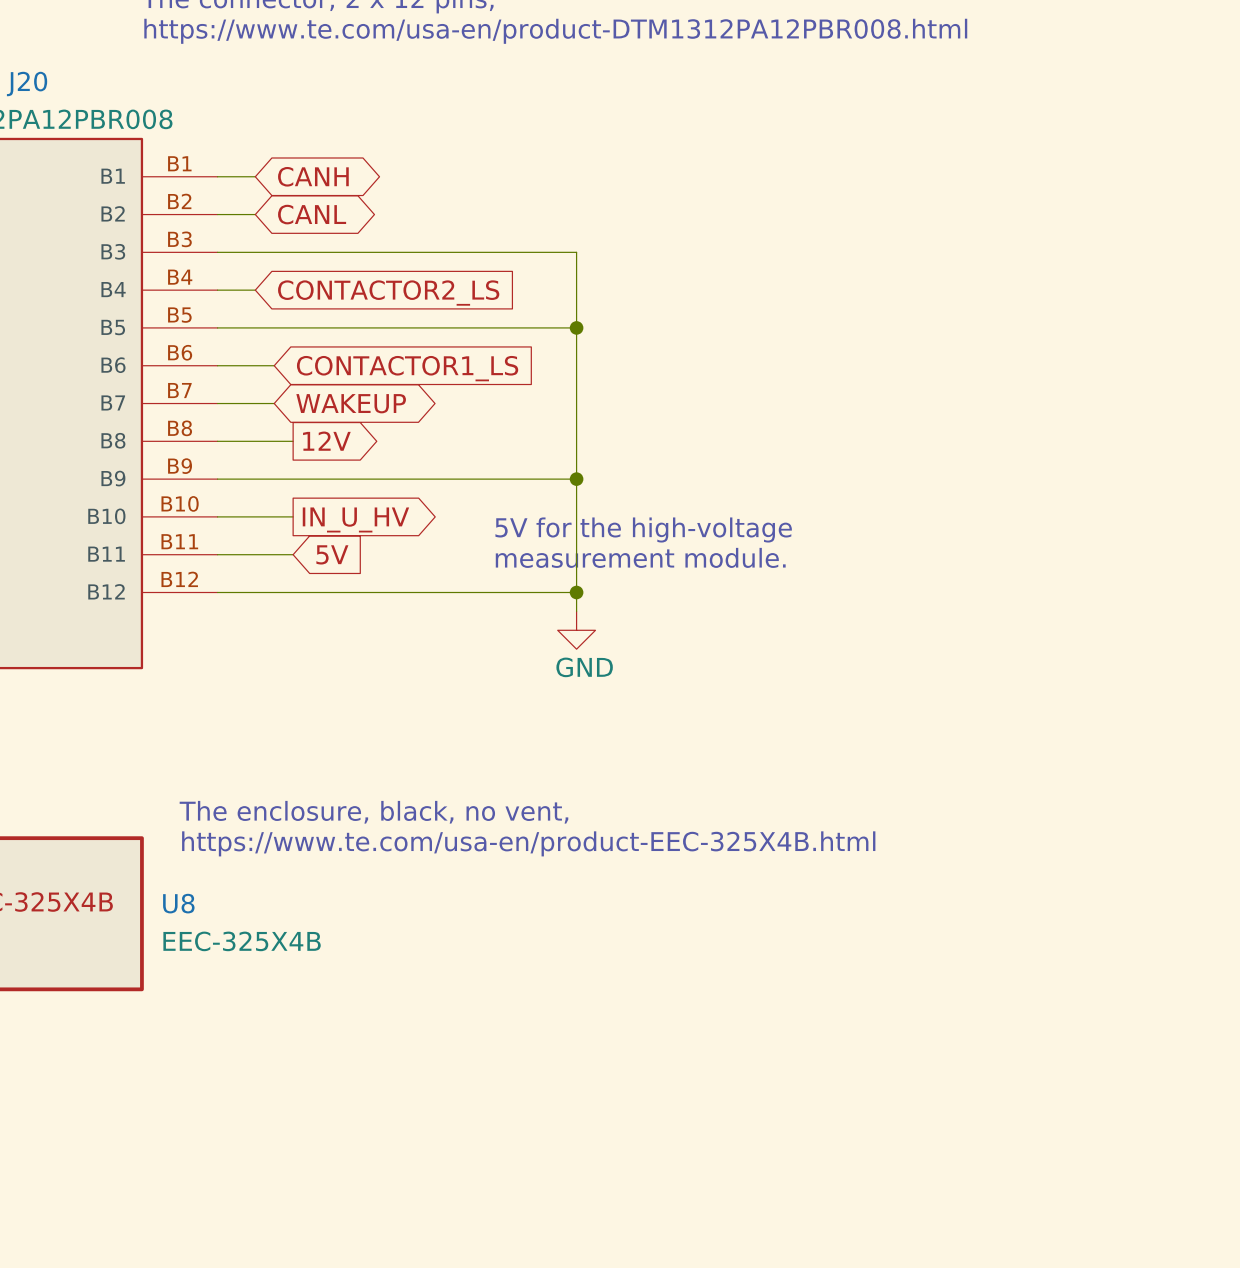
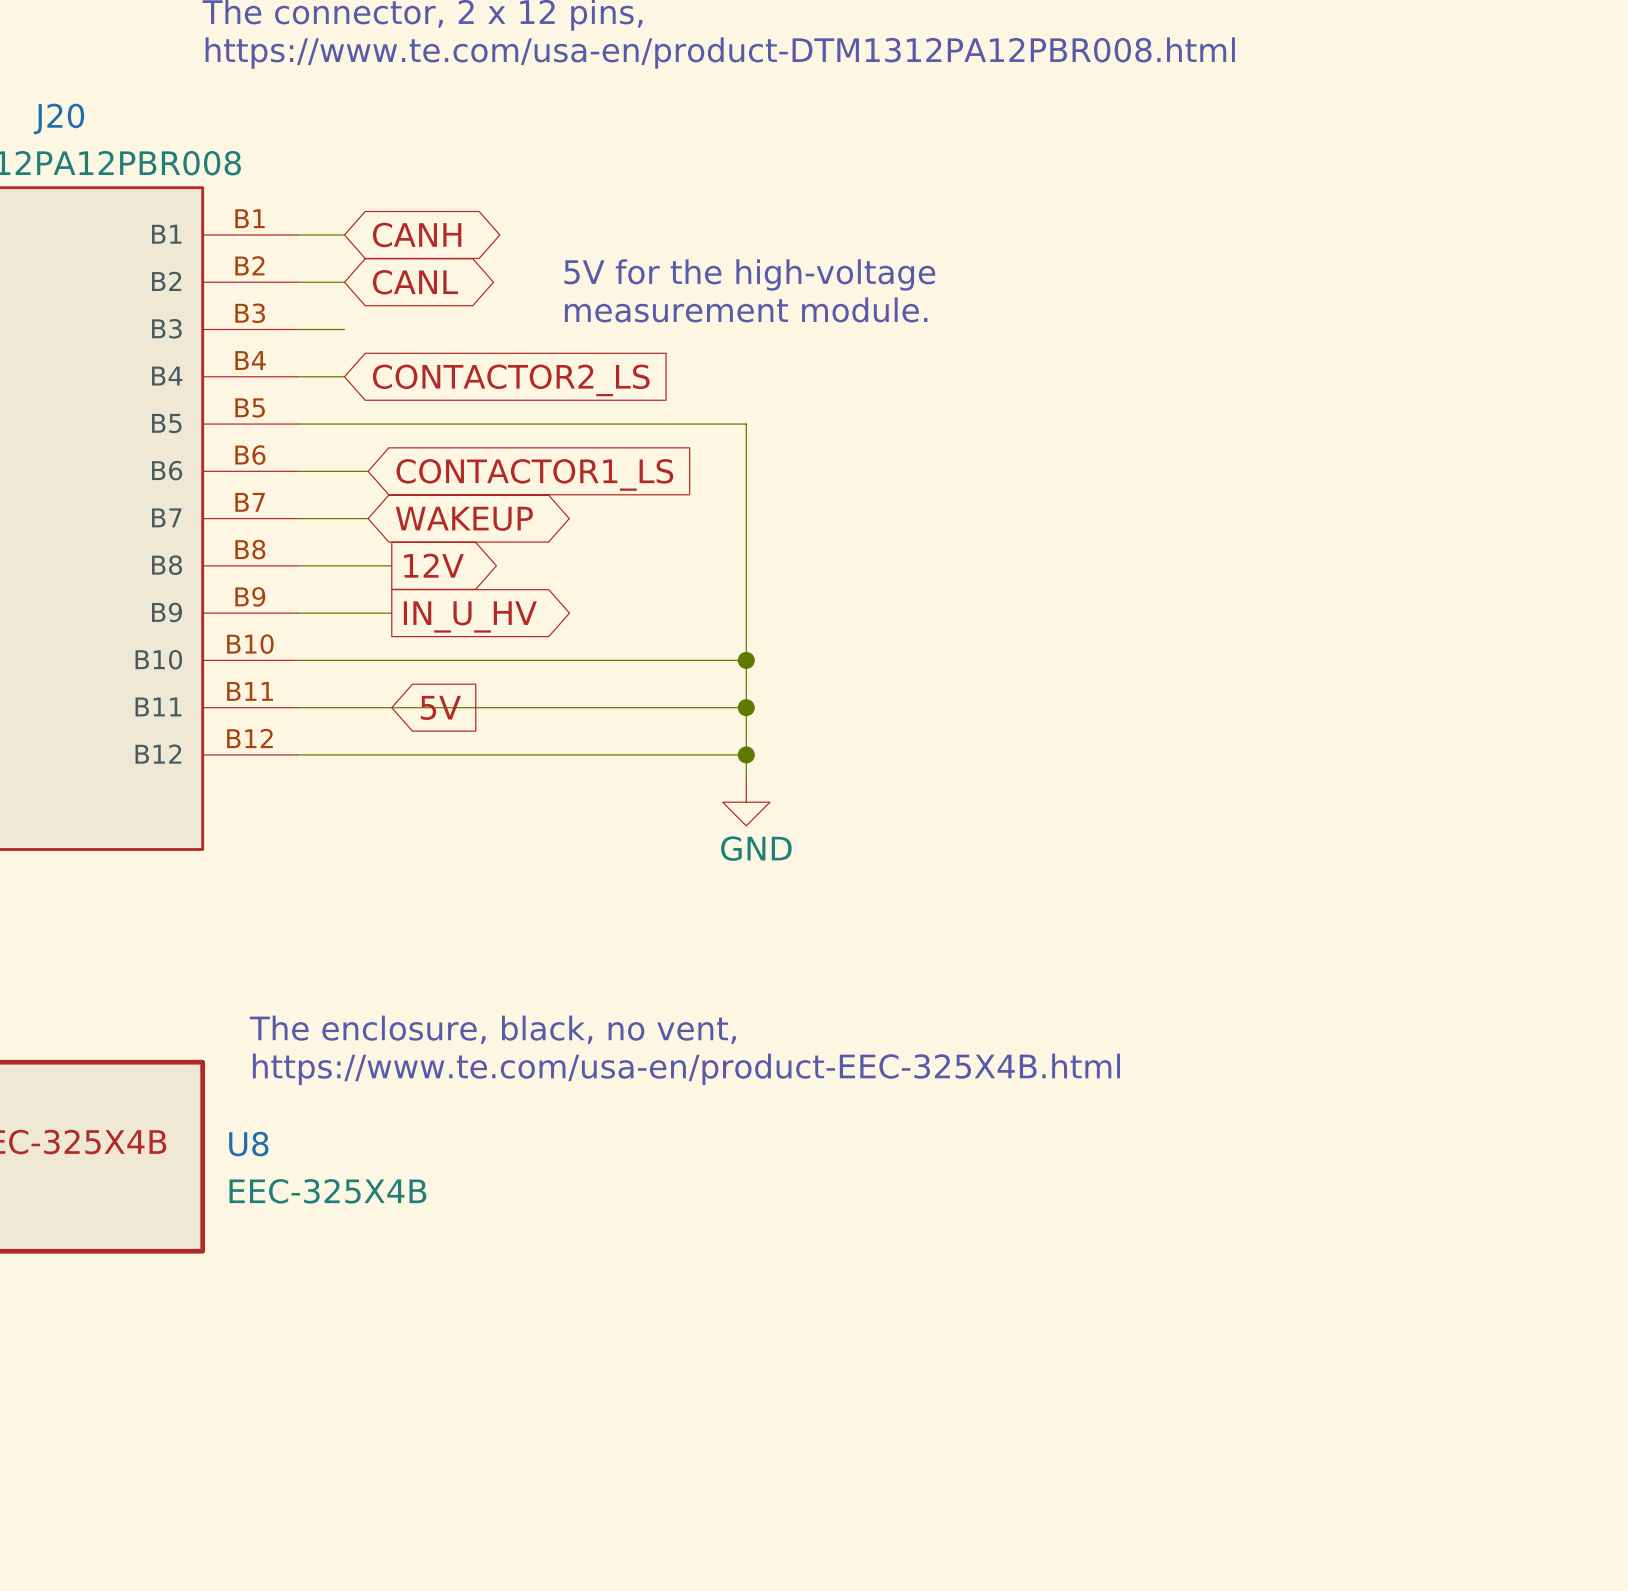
wire: (255, 252) (576, 252) (576, 327) -> none
junction: (576, 327) -> none
wire: (293, 479) (576, 479) -> (391, 660) (746, 660)
junction: (576, 479) -> none
junction: none -> (746, 660)
global label position: IN_U_HV (355, 519) -> IN_U_HV (470, 616)
text position: 5V for the high-voltage (643, 529) -> 5V for the high-voltage (749, 274)
wire: none -> (391, 707) (746, 707)
junction: none -> (746, 707)
text position: measurement module. (640, 557) -> measurement module. (746, 309)

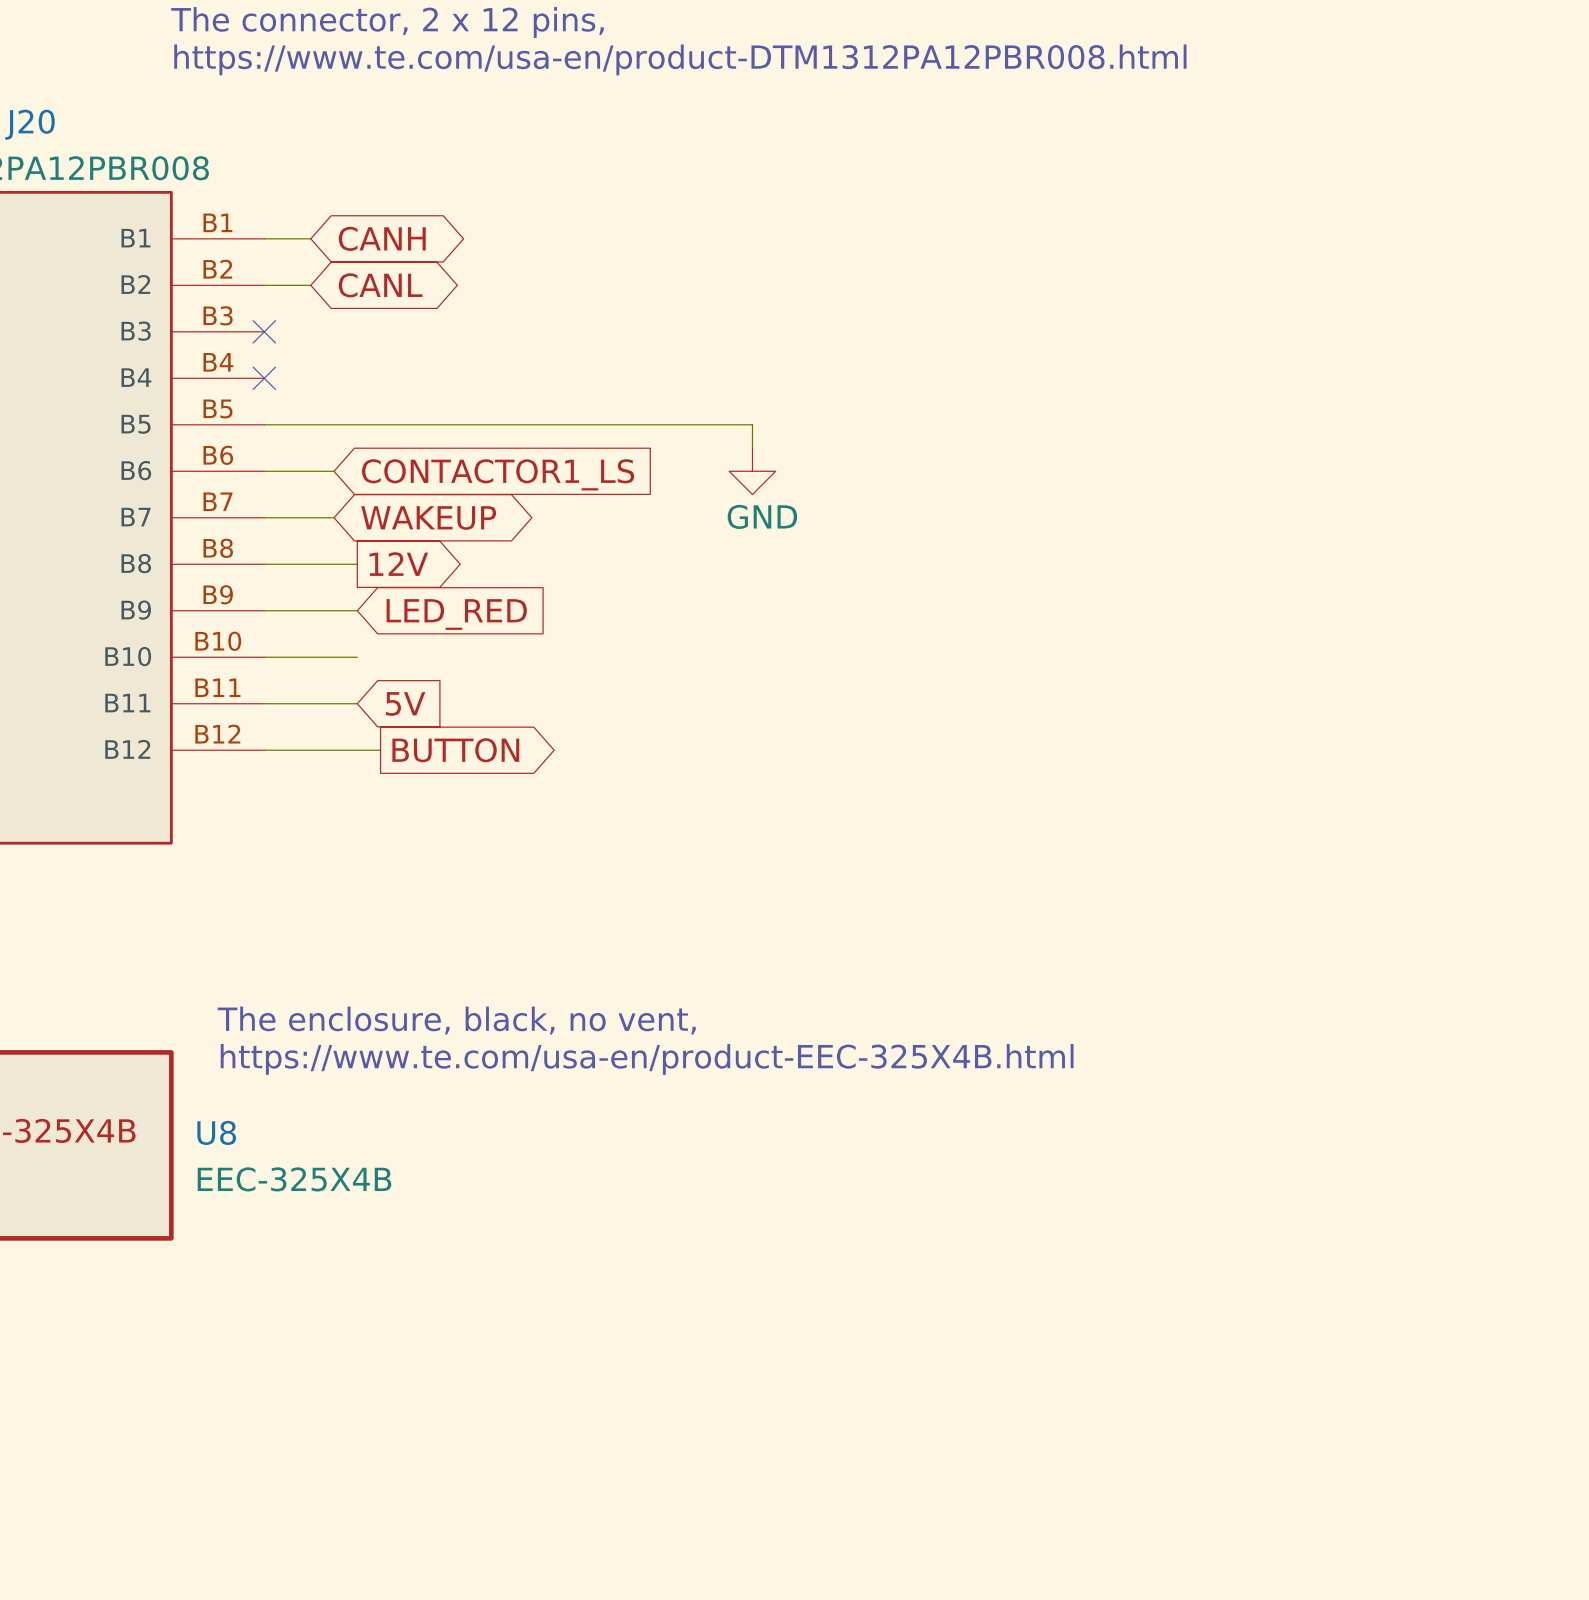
text: 5V for the high-voltage (749, 274) -> none
text: measurement module. (746, 309) -> none
wire: (297, 329) (344, 329) -> none
no-connect mark: none -> (264, 331)
wire: (297, 376) (344, 376) -> none
no-connect mark: none -> (264, 378)
global label: CONTACTOR2_LS (511, 380) -> none
wire: (746, 424) (746, 778) -> (705, 424) (752, 424) (752, 448)
global label shape: output (470, 616) -> input (456, 614)
global label: IN_U_HV (470, 616) -> LED_RED (456, 614)
wire: (391, 660) (746, 660) -> none
junction: (746, 660) -> none
wire: (391, 707) (746, 707) -> none
junction: (746, 707) -> none
wire: (415, 754) (746, 754) -> none
global label: none -> BUTTON (455, 750)
junction: (746, 754) -> none
power symbol position: GND (746, 802) -> GND (752, 471)

